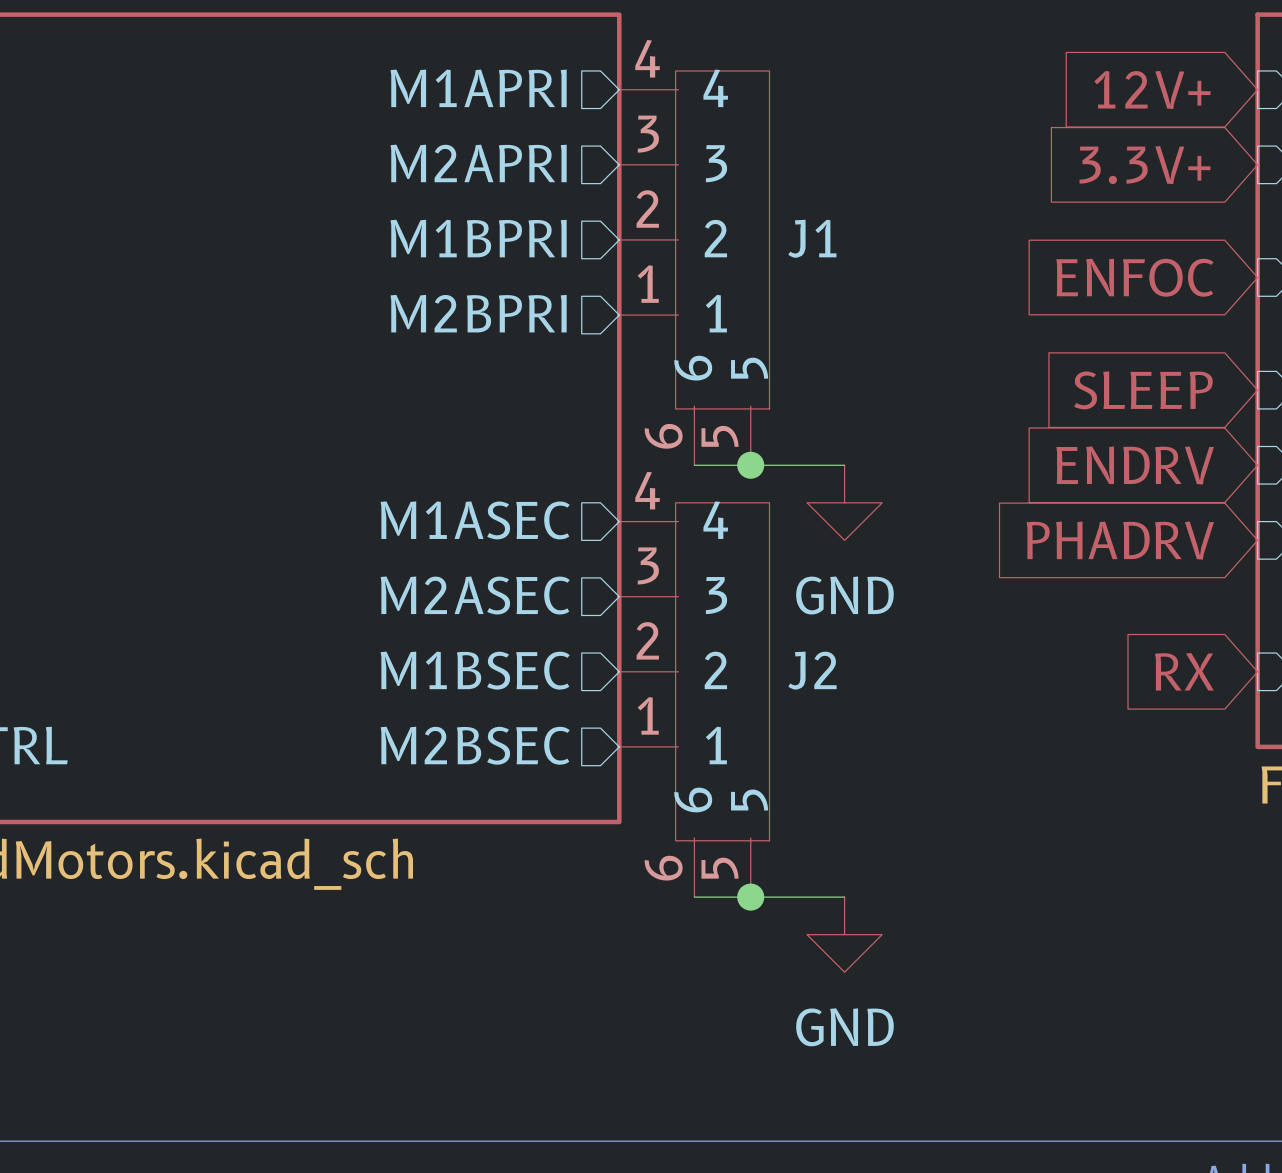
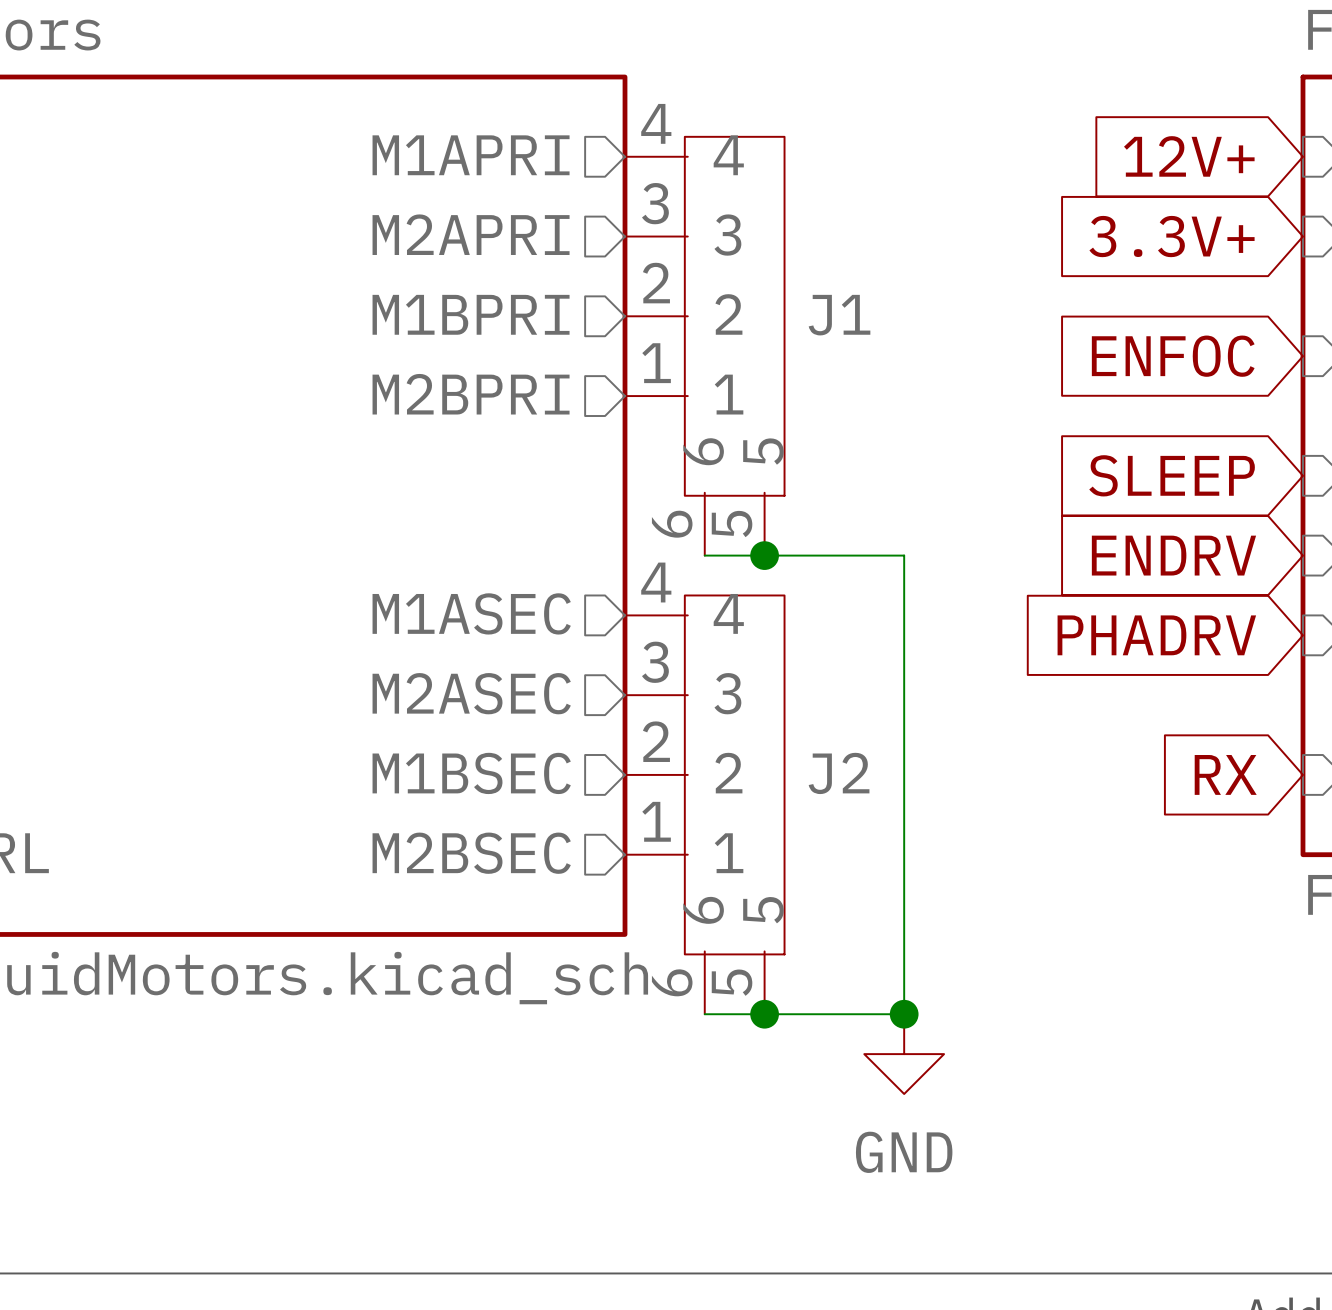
wire: none -> (864, 555) (904, 555) (904, 1014) (864, 1014)
power symbol: GND (844, 502) -> none
junction: none -> (904, 1014)
power symbol position: GND (844, 934) -> GND (904, 1054)

